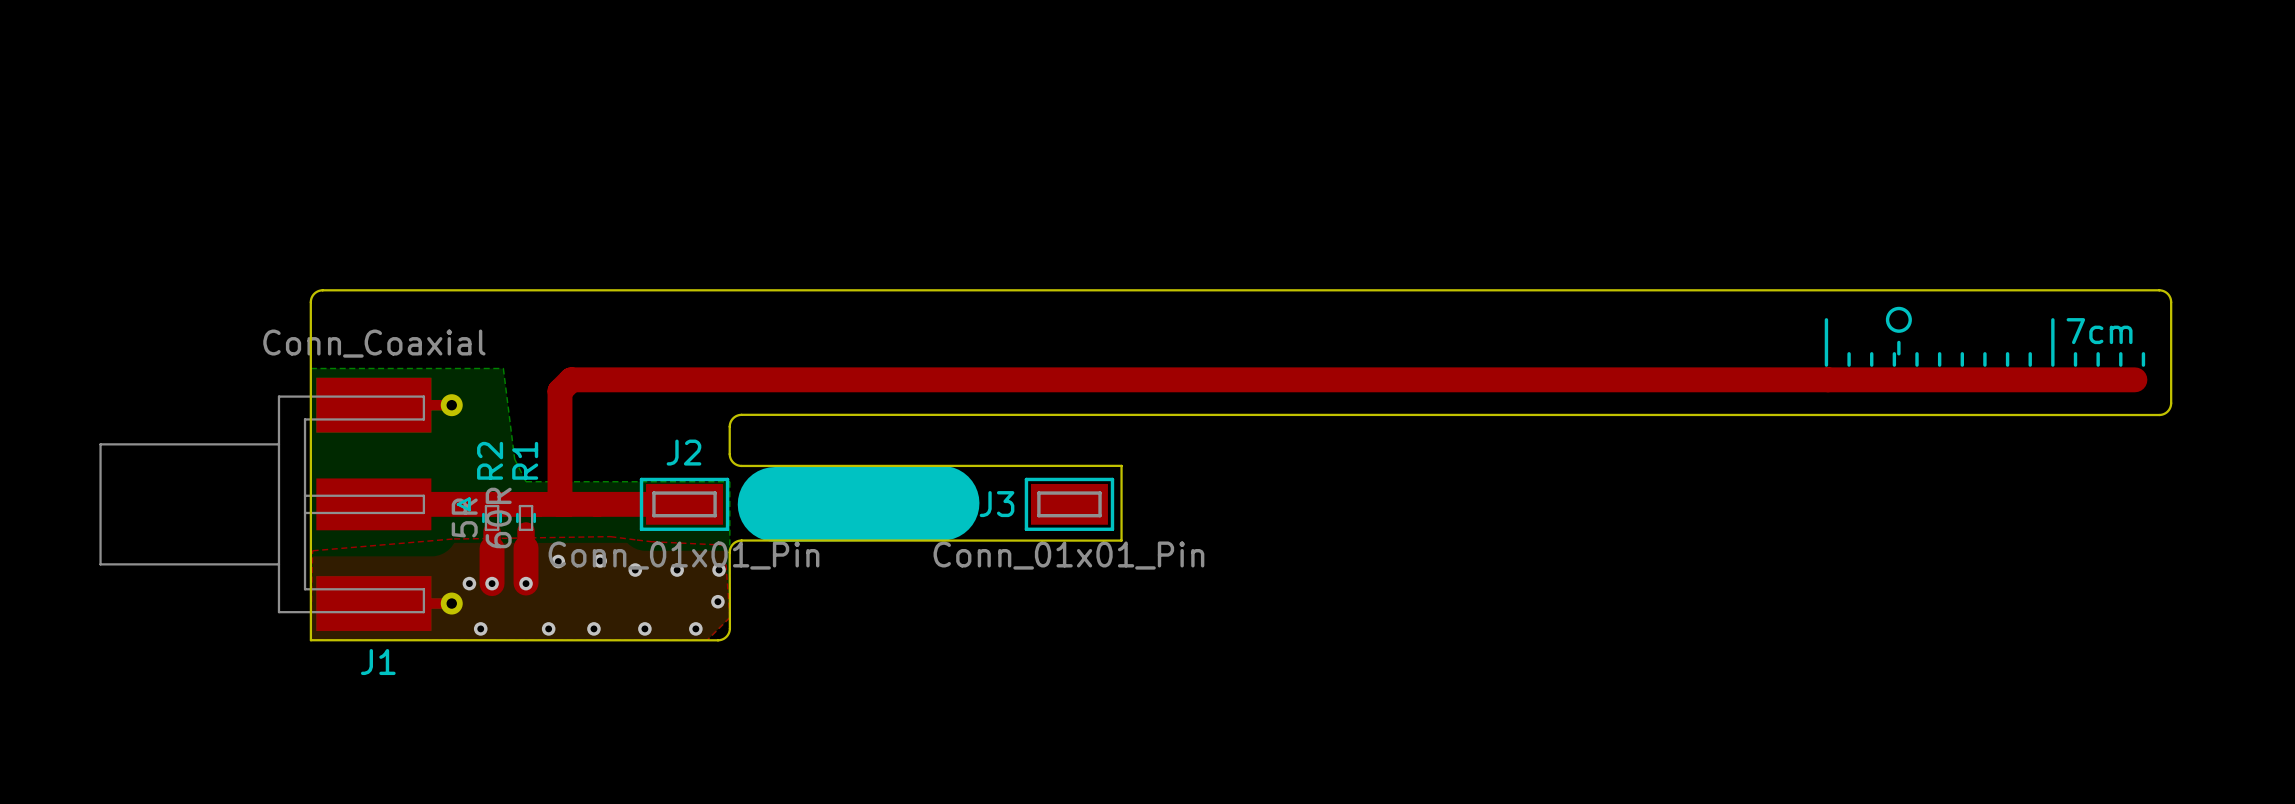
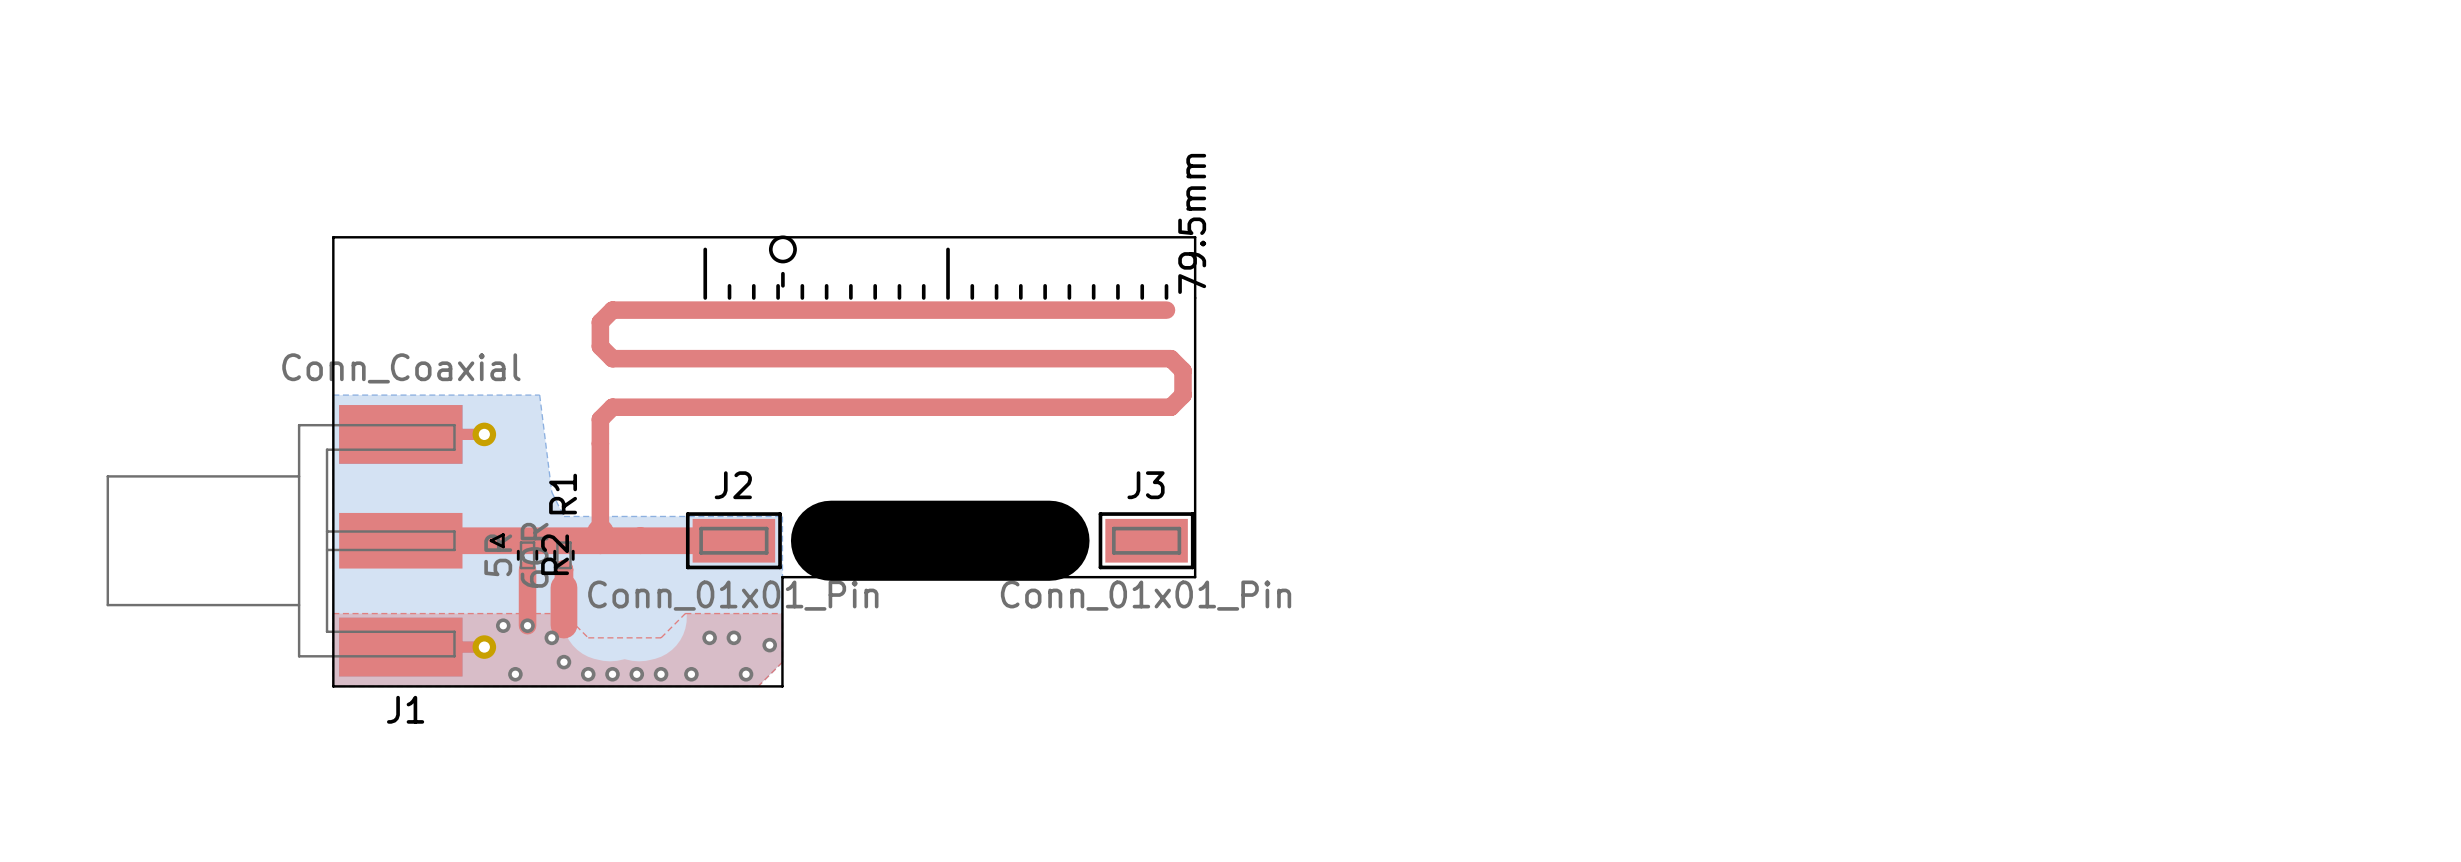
text: none -> 79.5mm (1192, 223)
drawing: none -> [768, 235, 797, 264]
board edge: none -> (333, 237) (333, 686) (782, 686) (782, 577) (1195, 577) (1195, 237) (333, 237)
line: none -> (705, 249) (705, 297)
line: none -> (948, 249) (948, 297)
line: none -> (782, 273) (782, 285)
line: none -> (729, 285) (729, 297)
line: none -> (753, 285) (753, 297)
line: none -> (778, 285) (778, 297)
line: none -> (802, 285) (802, 297)
line: none -> (826, 285) (826, 297)
line: none -> (850, 285) (850, 297)
line: none -> (875, 285) (875, 297)
line: none -> (899, 285) (899, 297)
line: none -> (923, 285) (923, 297)
line: none -> (972, 285) (972, 297)
line: none -> (996, 285) (996, 297)
line: none -> (1020, 285) (1020, 297)
line: none -> (1045, 285) (1045, 297)
line: none -> (1069, 285) (1069, 297)
line: none -> (1093, 285) (1093, 297)
line: none -> (1117, 285) (1117, 297)
line: none -> (1142, 285) (1142, 297)
line: none -> (1166, 285) (1166, 297)
board edge: (322, 290) (2159, 290) (2167, 293) (2171, 300) (2171, 403) (2167, 411) (2159, 415) (740, 414) (733, 418) (730, 423) (729, 454) (733, 462) (740, 465) (1121, 465) (1121, 540) (738, 540) (733, 543) (729, 550) (729, 629) (726, 636) (719, 640) (310, 640) (310, 302) (314, 293) (322, 290) -> none
drawing: [1885, 306, 1912, 333] -> none
line: (1826, 319) (1826, 365) -> none
line: (2052, 319) (2052, 365) -> none
text: 7cm (2099, 331) -> none
line: (1898, 342) (1898, 353) -> none
line: (1849, 353) (1849, 365) -> none
line: (1871, 353) (1871, 365) -> none
line: (1894, 353) (1894, 365) -> none
line: (1917, 353) (1917, 365) -> none
line: (1939, 353) (1939, 365) -> none
line: (1962, 353) (1962, 365) -> none
line: (1984, 353) (1984, 365) -> none
line: (2007, 353) (2007, 365) -> none
line: (2030, 353) (2030, 365) -> none
line: (2075, 353) (2075, 365) -> none
line: (2098, 353) (2098, 365) -> none
line: (2120, 353) (2120, 365) -> none
line: (2143, 353) (2143, 365) -> none
top track: (1092, 379) (2134, 379) -> (1170, 407) (1183, 395) (1183, 370) (1170, 358) (612, 358) (600, 346) (600, 322) (612, 310) (1166, 310)
top track width: thick (1092, 379) (571, 379) (559, 391) (559, 496) -> thin (1170, 407) (612, 407) (600, 419) (600, 532)
R2 name position: R2 (490, 460) -> R2 (555, 554)
line: (942, 503) (775, 504) -> (1049, 540) (831, 540)
J3 name position: J3 (997, 504) -> J3 (1146, 485)
top track width: thick (492, 531) (492, 583) -> thin (527, 569) (527, 625)
via: (600, 560) -> none
via: (558, 561) -> none
via: (635, 570) -> none
via: (677, 570) -> none
via: (719, 570) -> none
via position: (526, 583) -> (551, 637)
via: none -> (709, 637)
via: none -> (733, 637)
via: none -> (563, 662)
top zone outline: (729, 617) (724, 545) (651, 541) (610, 536) (454, 538) (312, 550) (310, 640) -> (782, 662) (782, 613) (685, 613) (661, 637) (588, 637) (563, 613) (333, 613) (333, 686)
via: none -> (612, 674)
via: none -> (661, 674)

